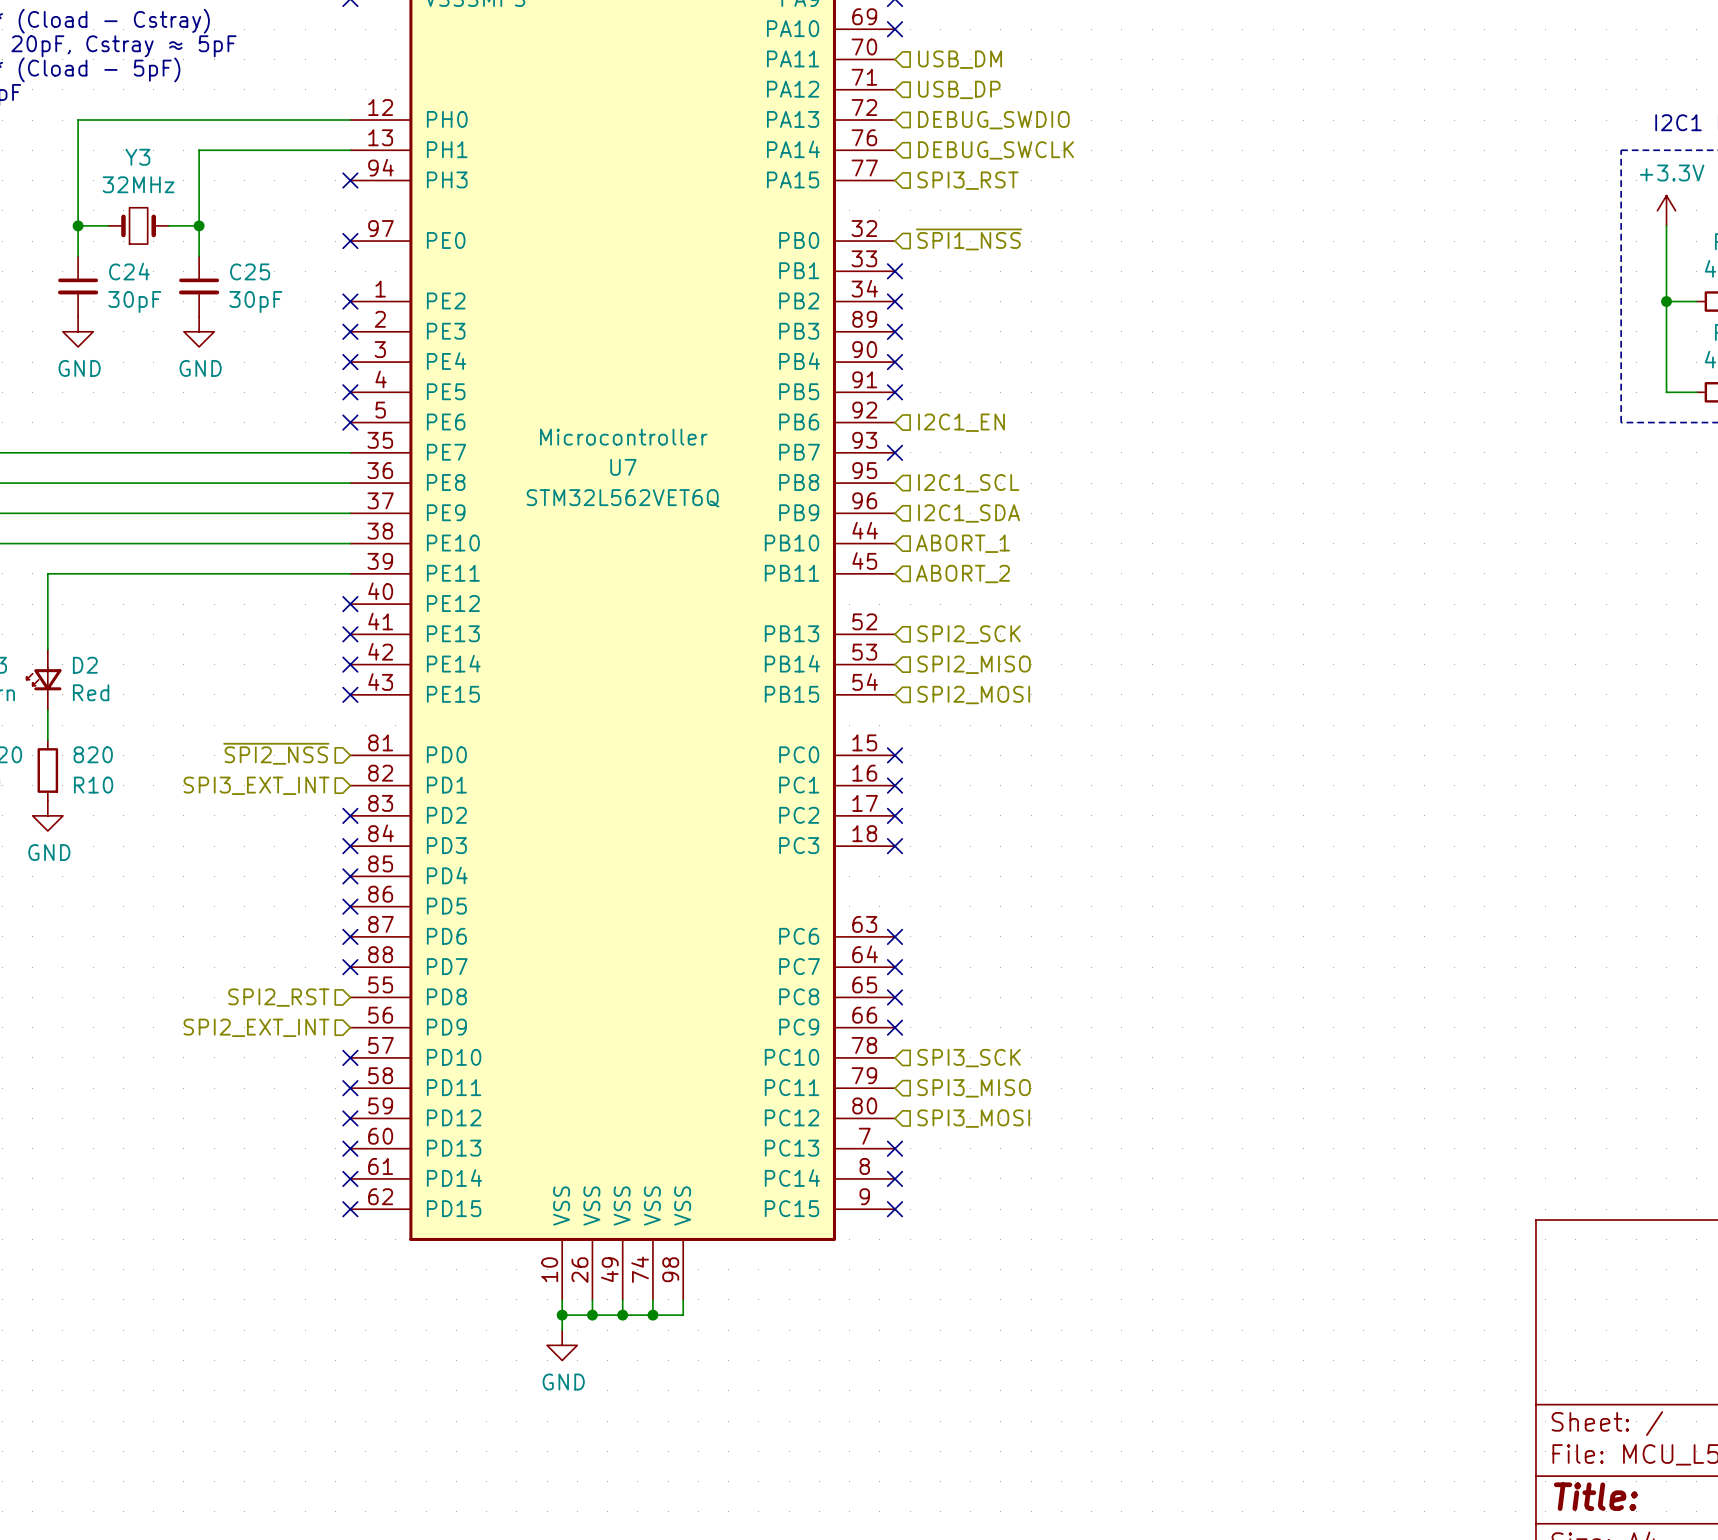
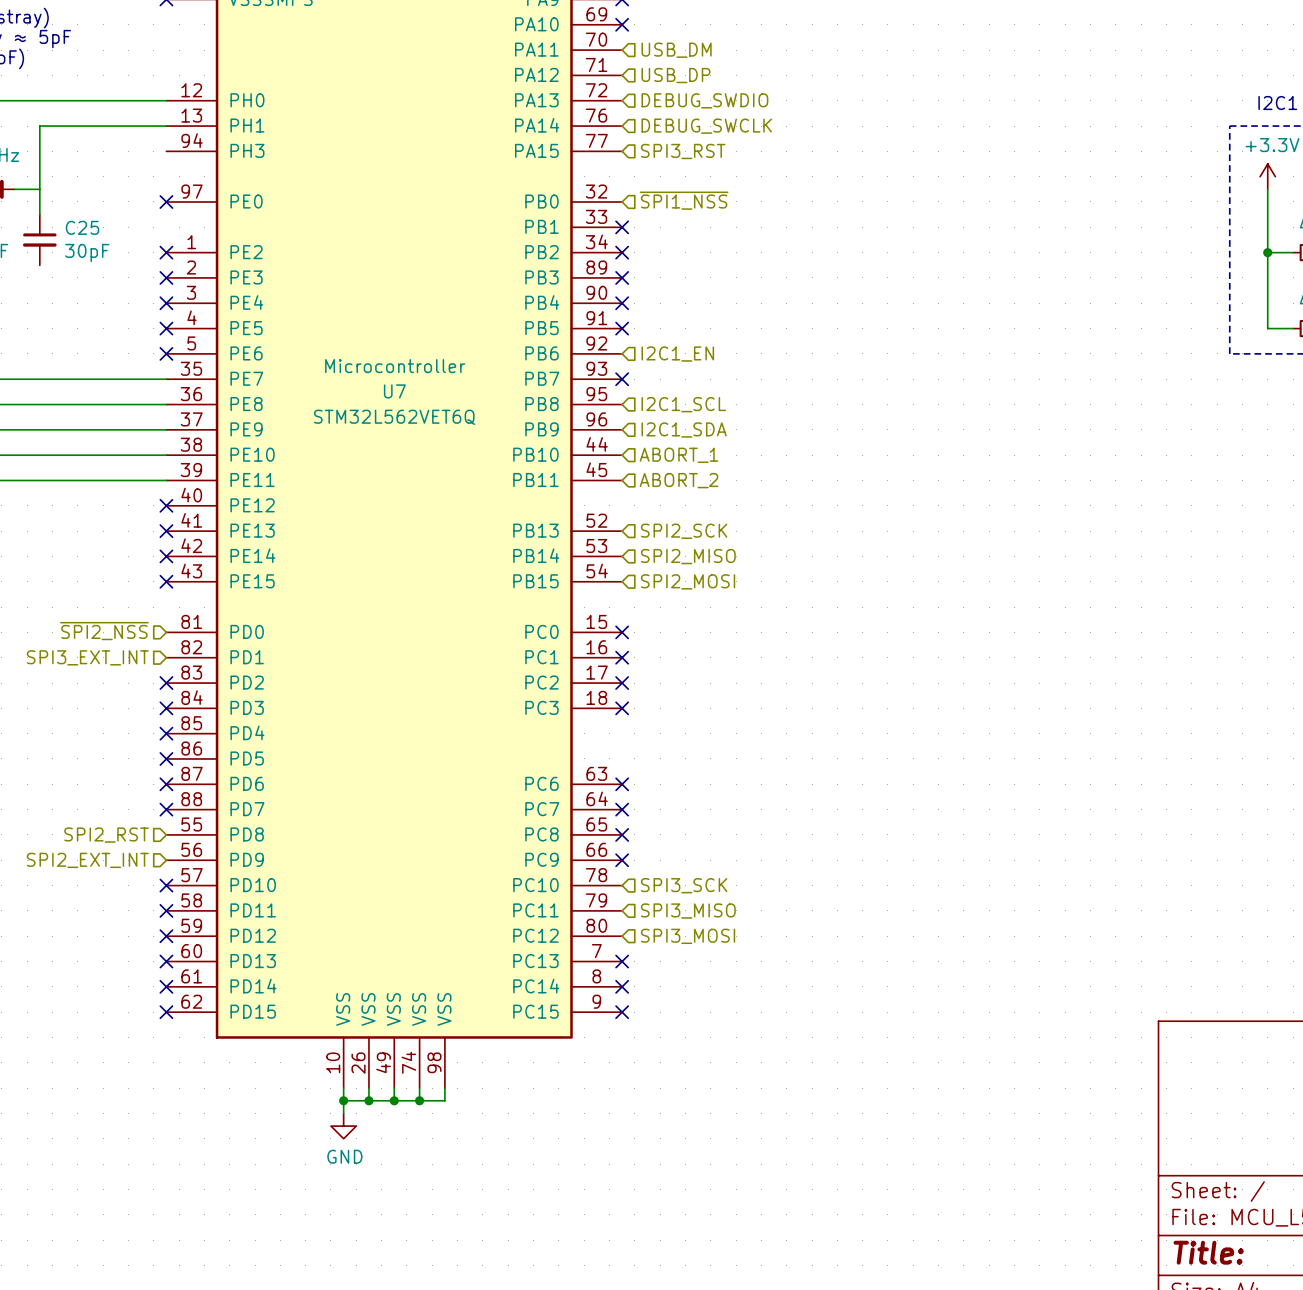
no-connect mark: (350, 180) -> none
junction: (199, 225) -> none
power symbol: GND (199, 331) -> none

